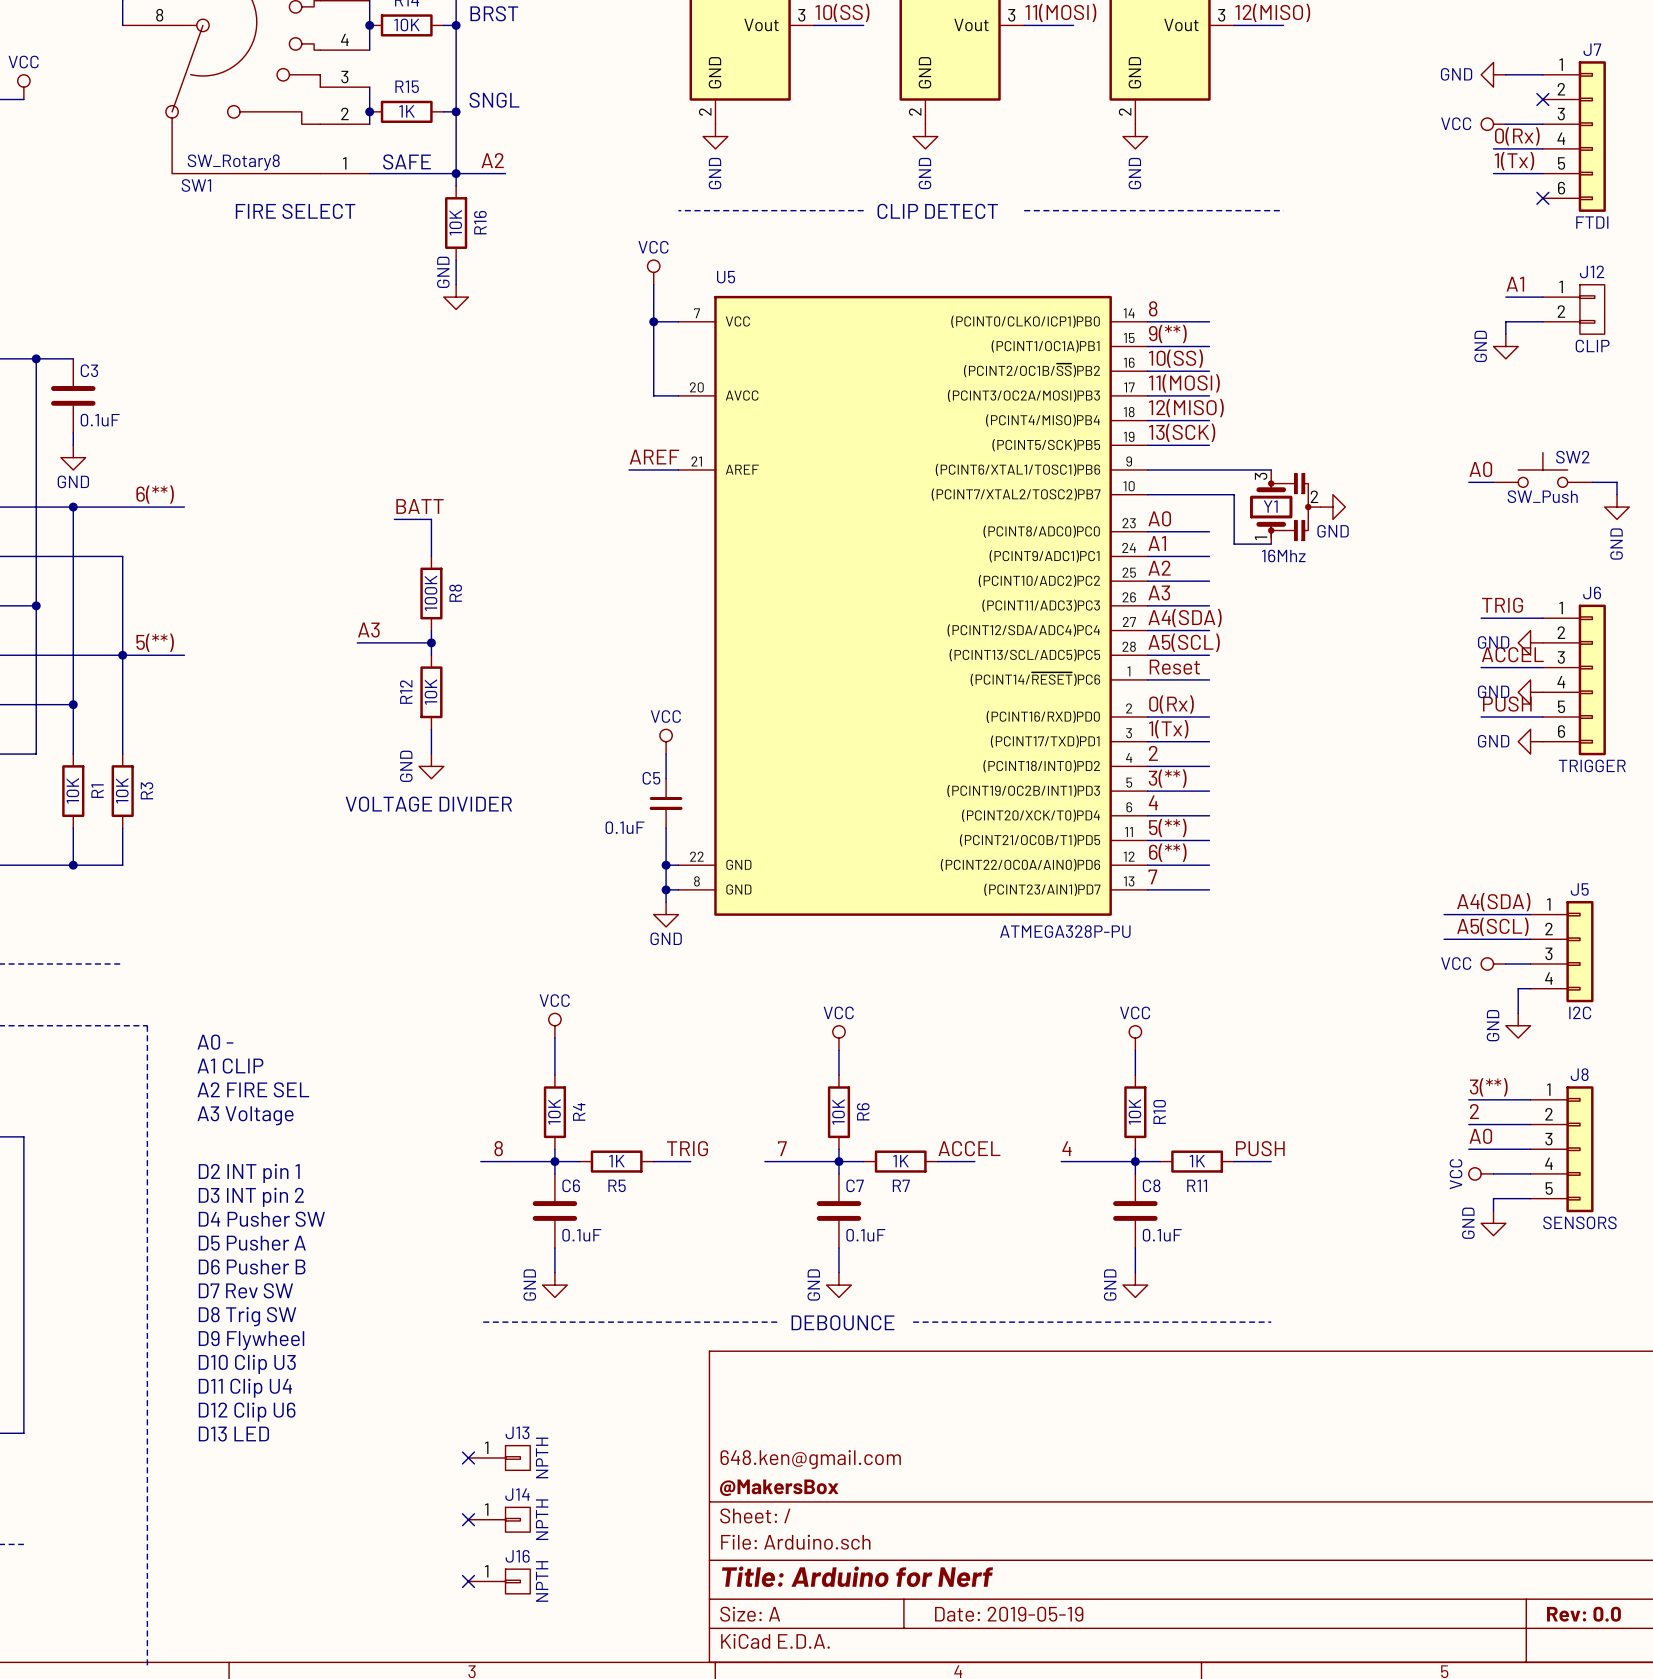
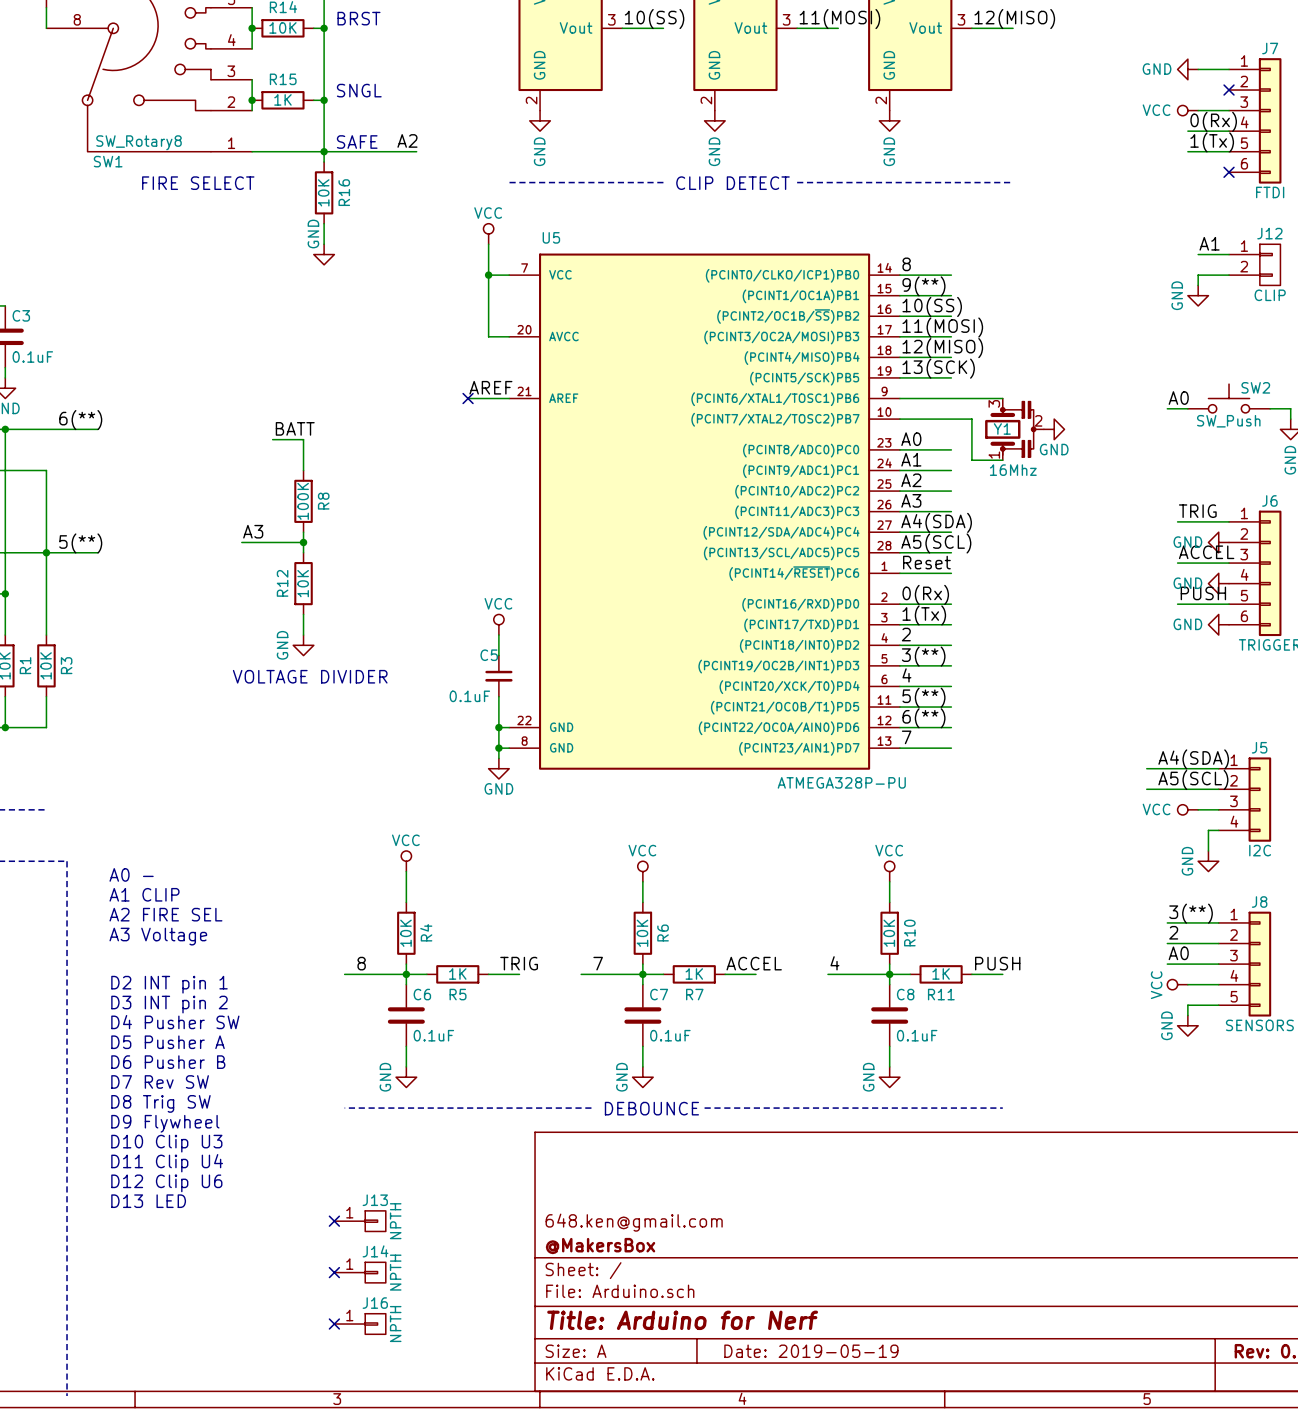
label position: A2 (492, 160) -> A2 (407, 140)
text position: SAFE (406, 161) -> SAFE (357, 142)
wire: none -> (365, 151) (416, 151)
no-connect mark: none -> (468, 398)

